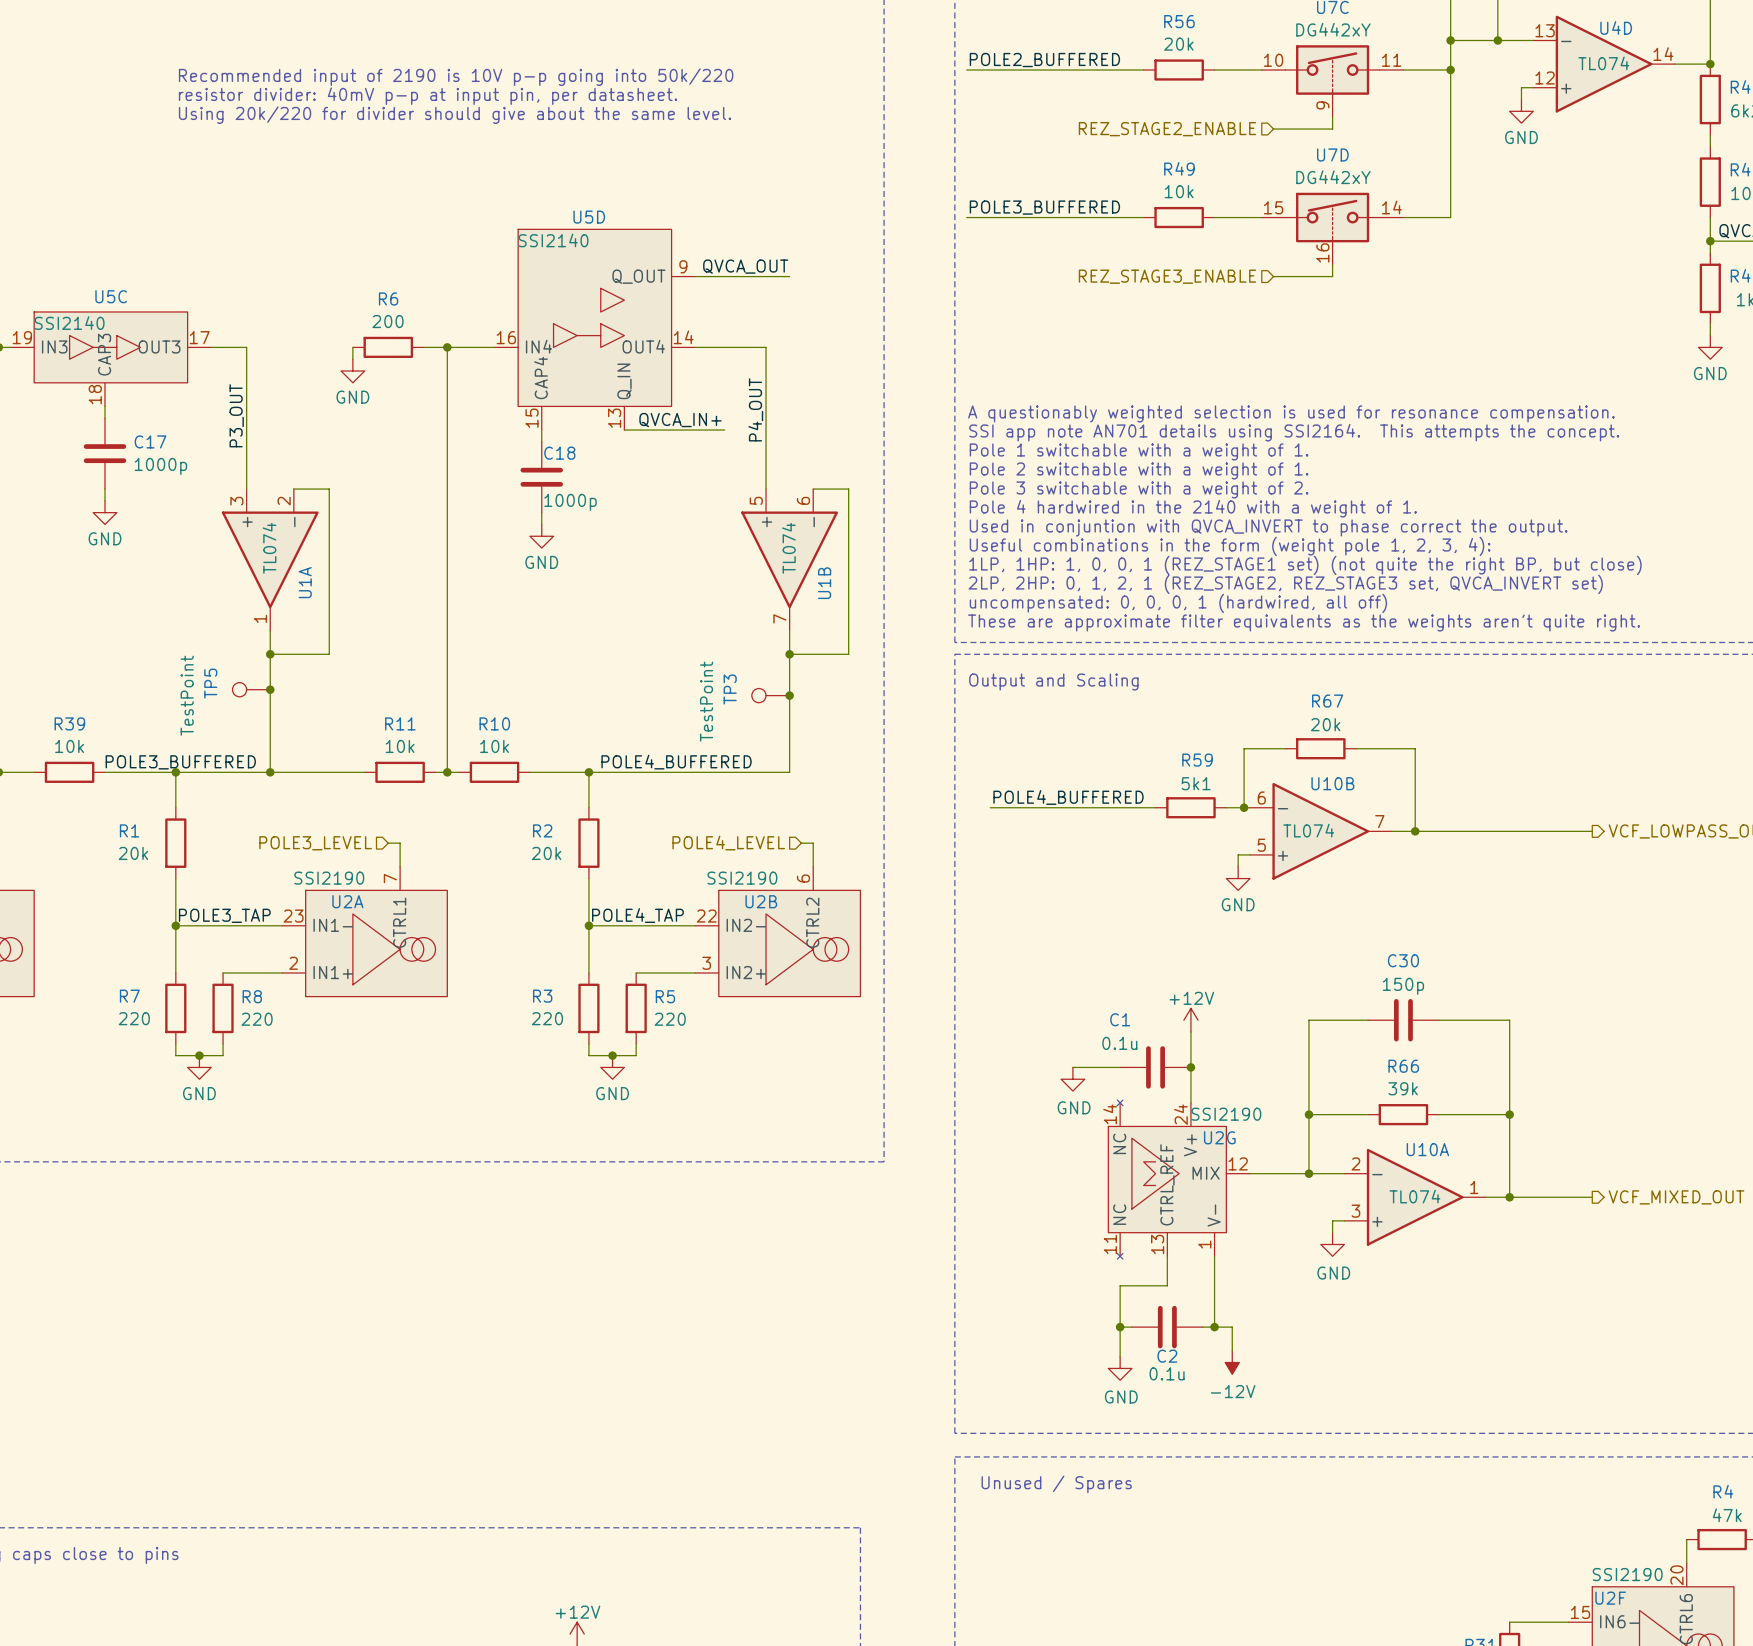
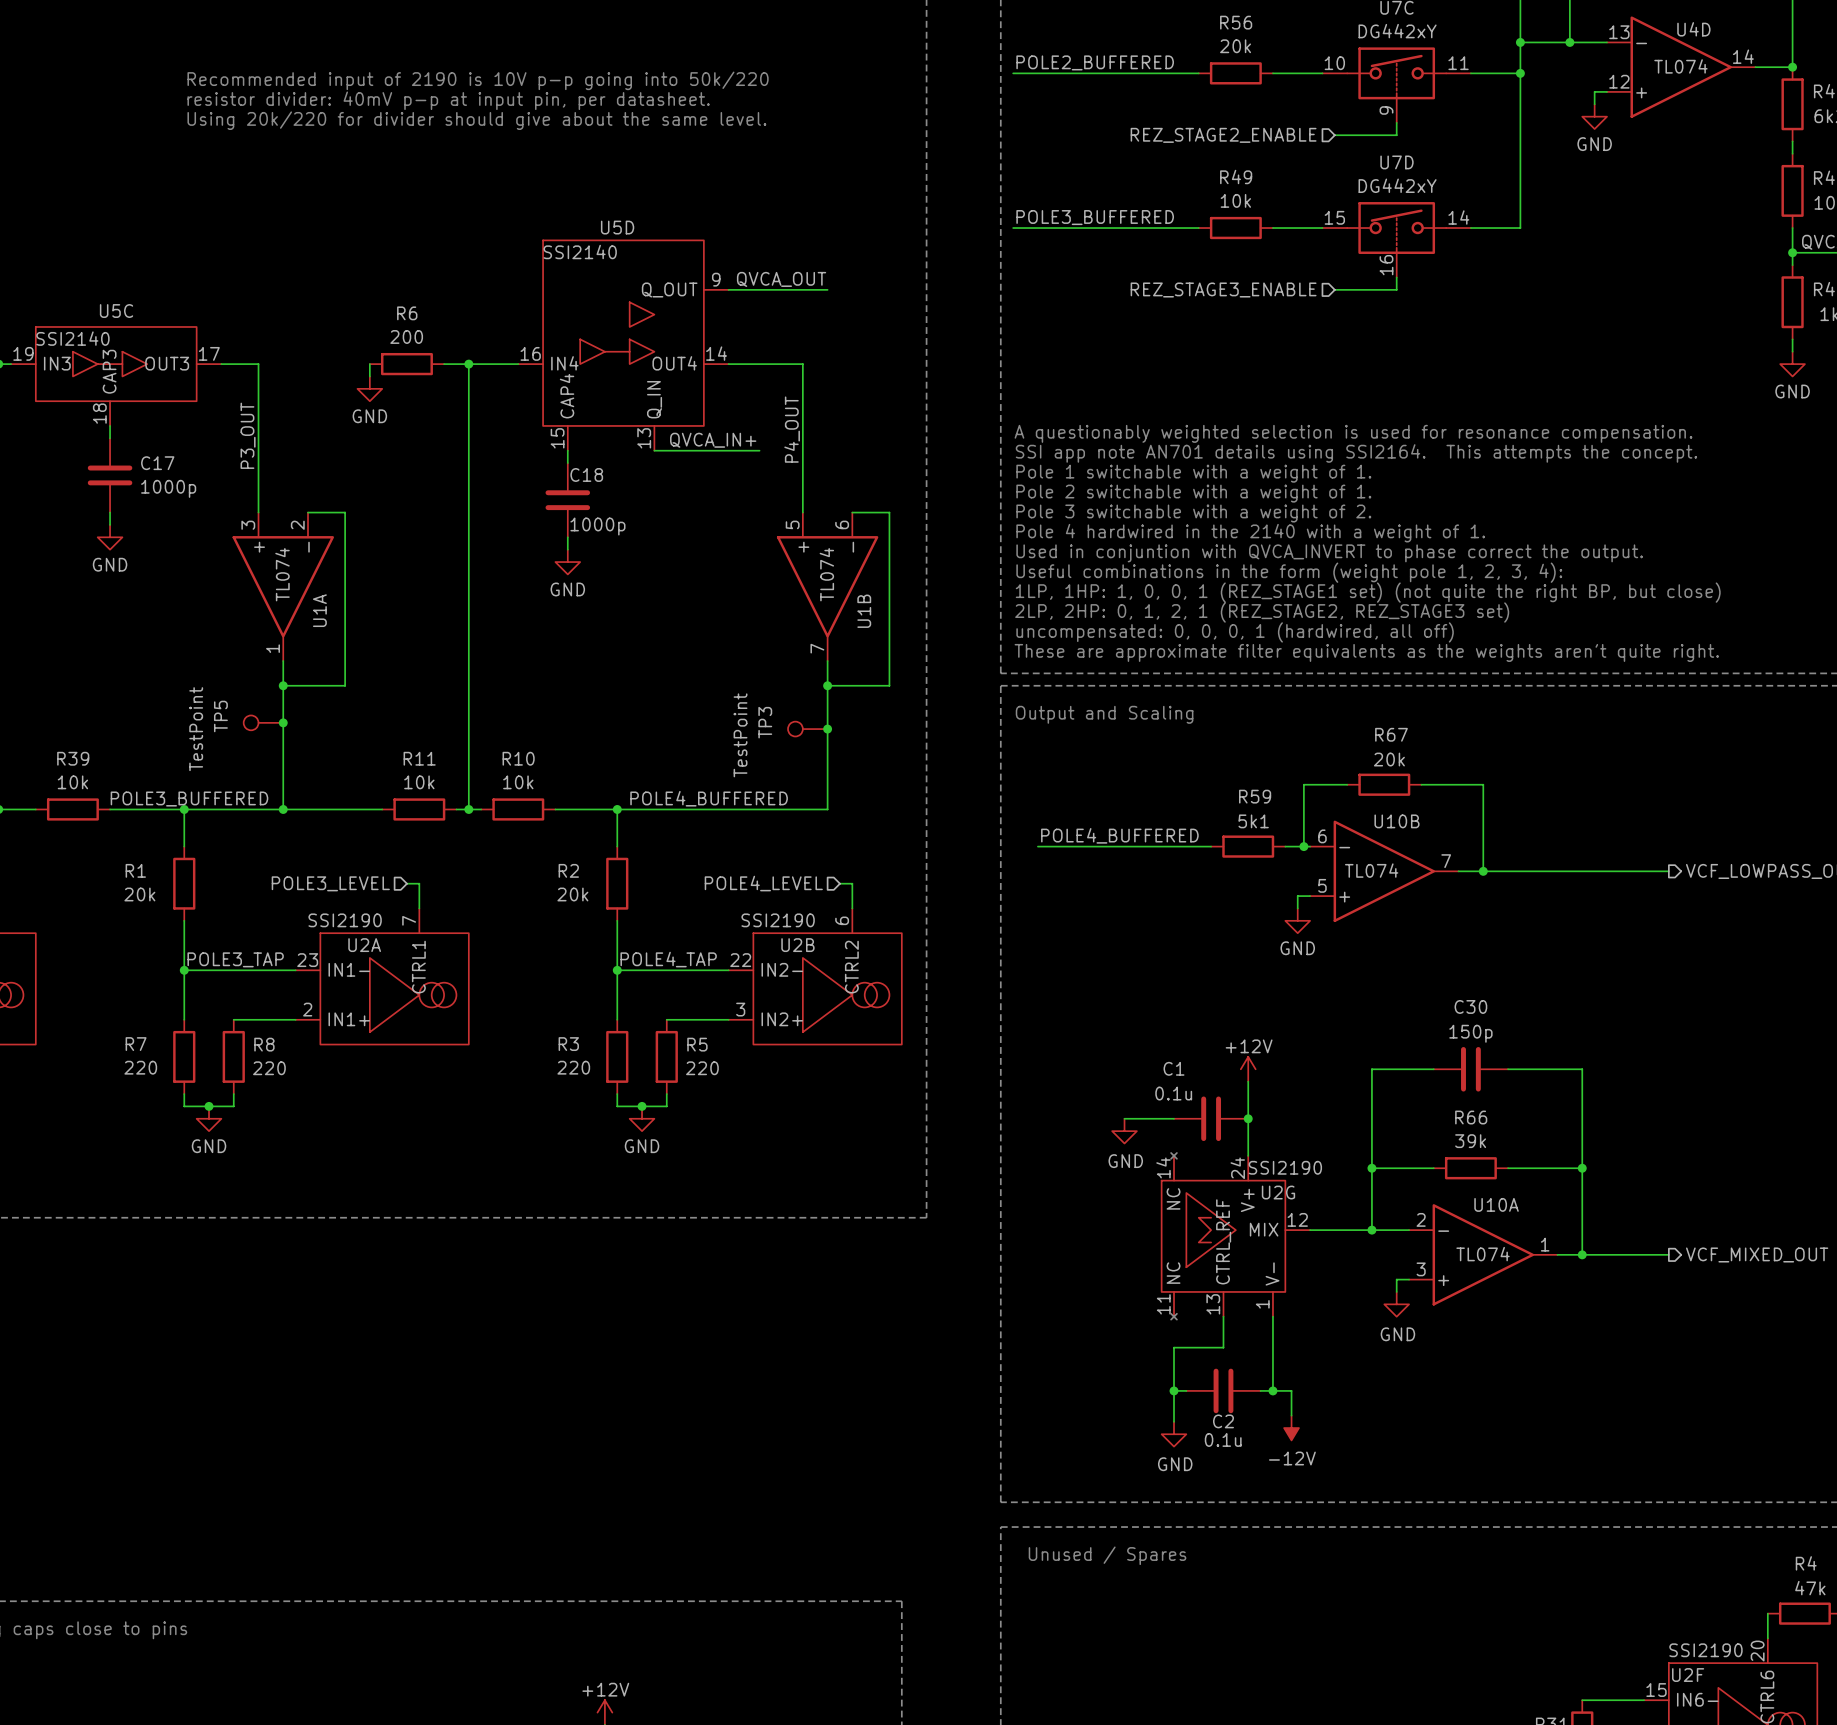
text: 2LP, 2HP: 0, 1, 2, 1 (REZ_STAGE2, REZ_STAGE3 set, QVCA_INVERT set) (1285, 584) -> 2LP, 2HP: 0, 1, 2, 1 (REZ_STAGE2, REZ_STAGE3 set) (1262, 612)

